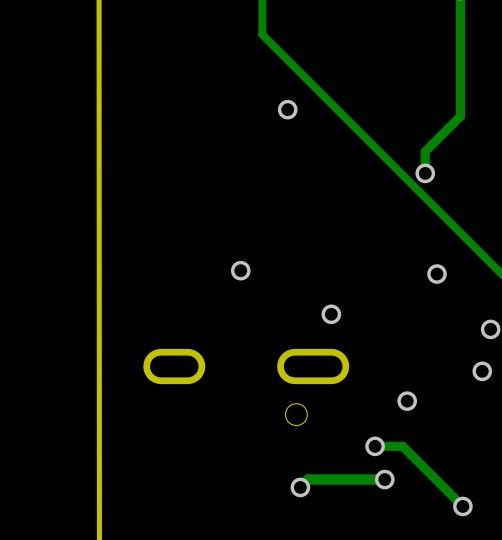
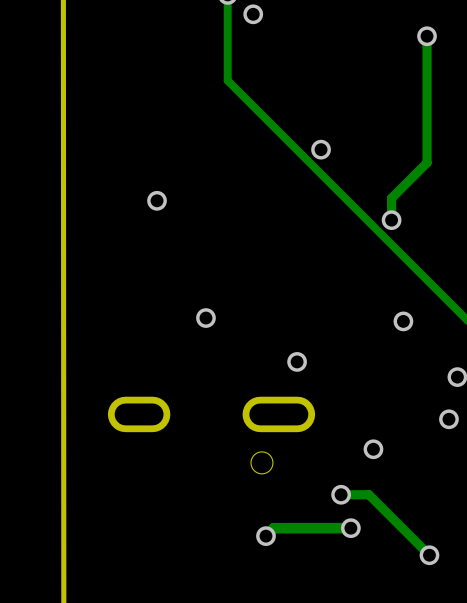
via: none -> (321, 149)
via: (287, 109) -> none
via: none -> (157, 200)

